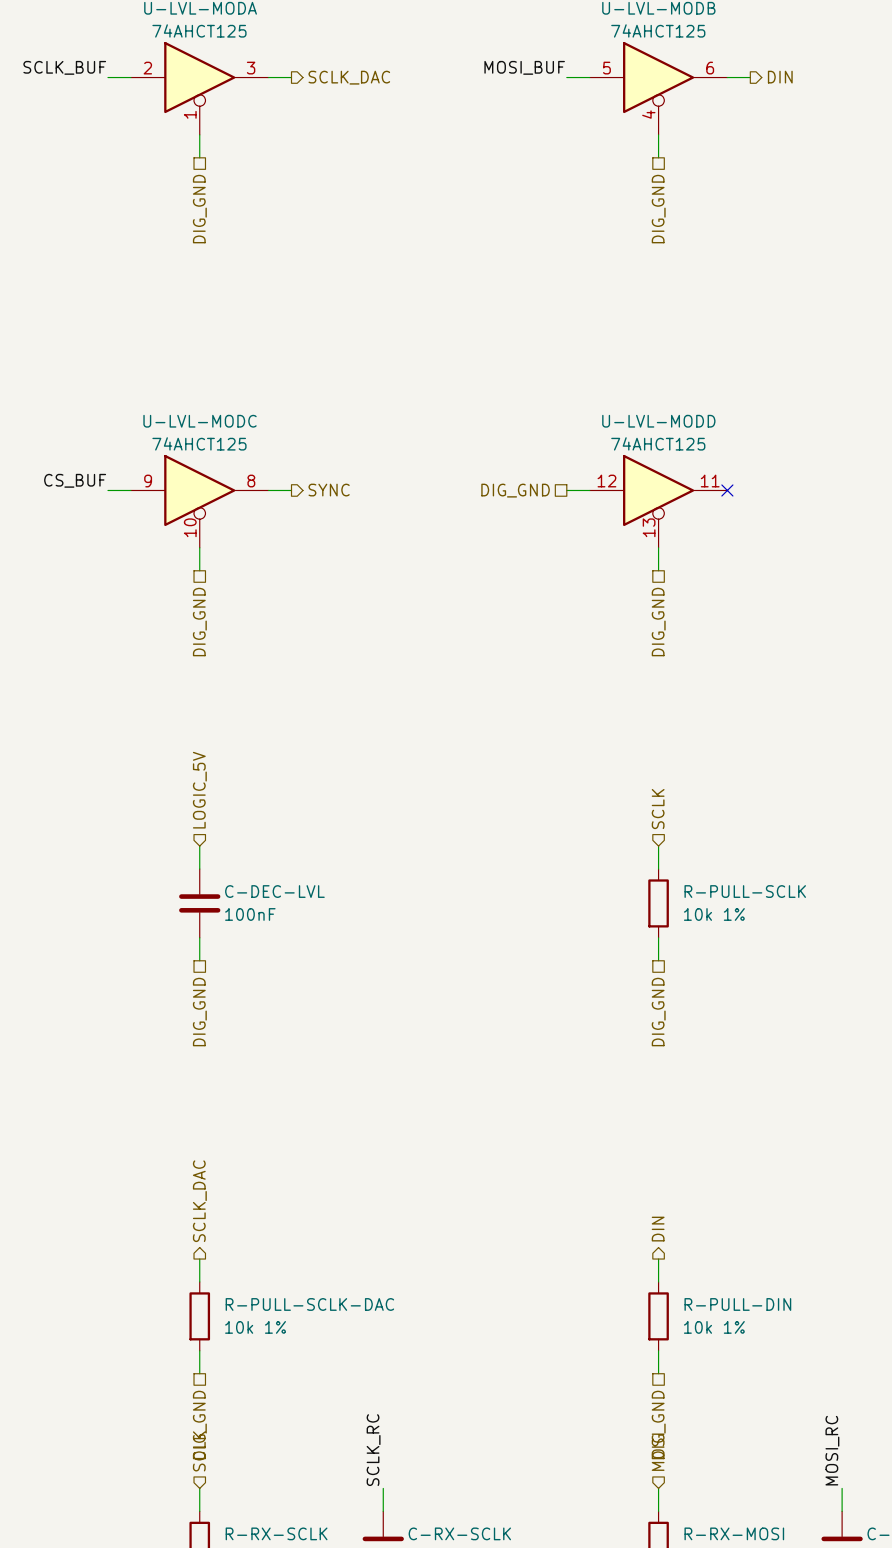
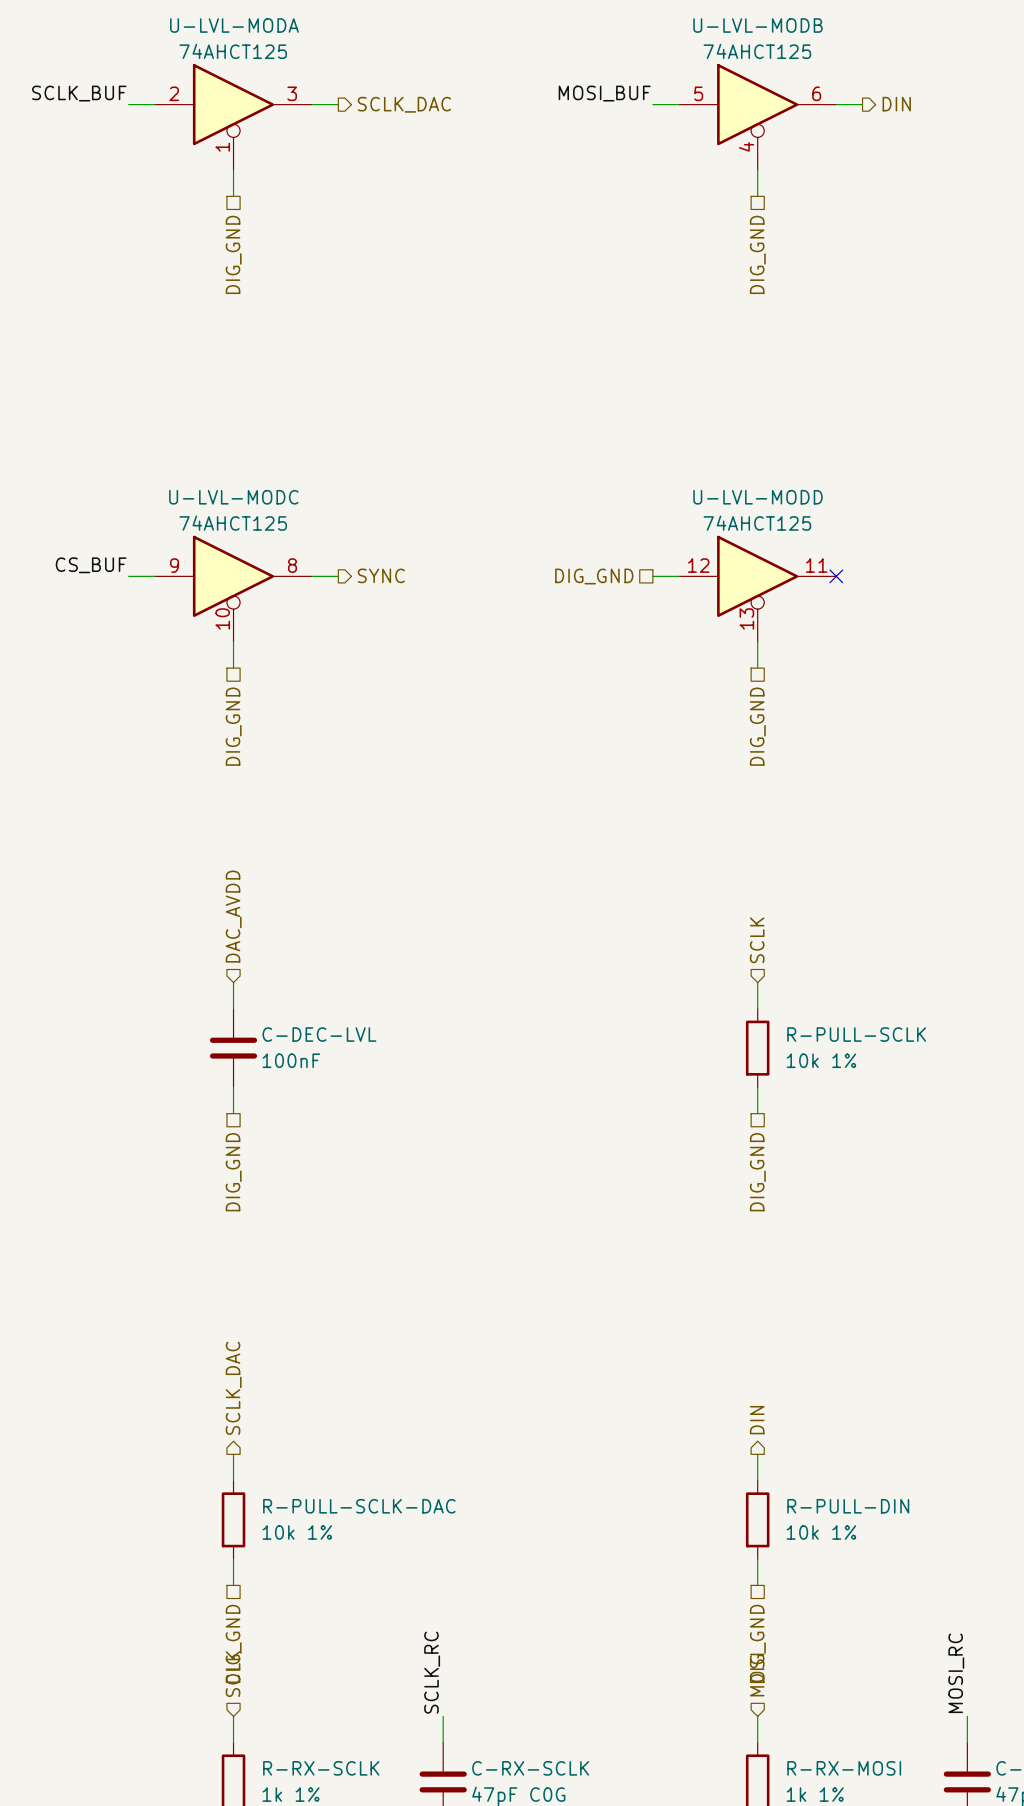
hierarchical label: LOGIC_5V (199, 790) -> DAC_AVDD (233, 916)

